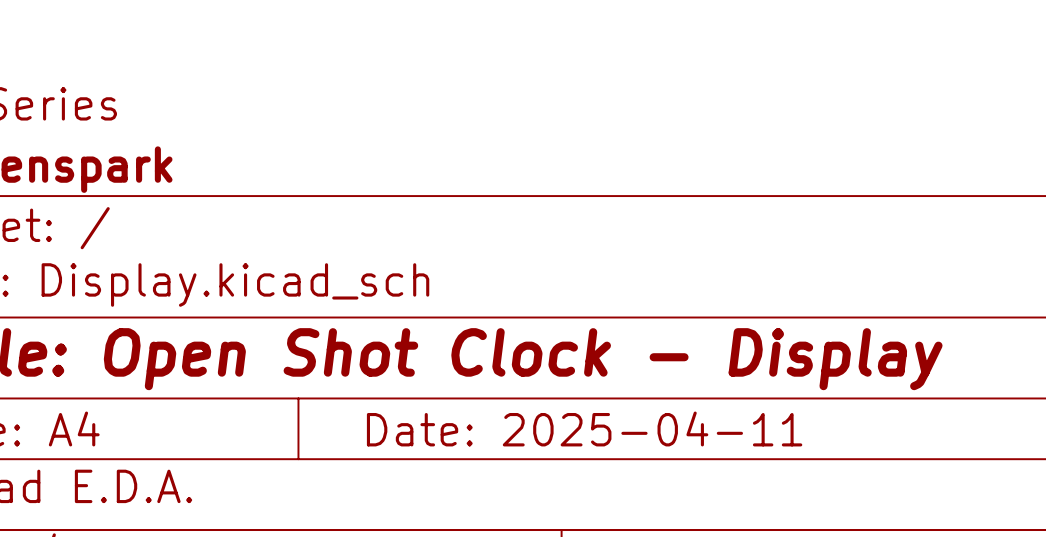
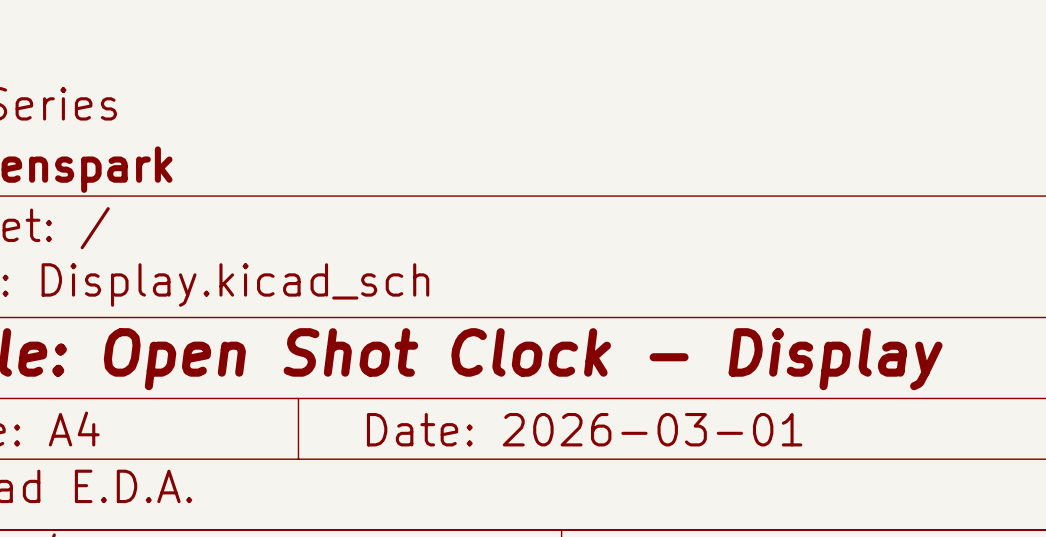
title block: Date: 2025-04-11 (584, 428) -> Date: 2026-03-01 (584, 429)

